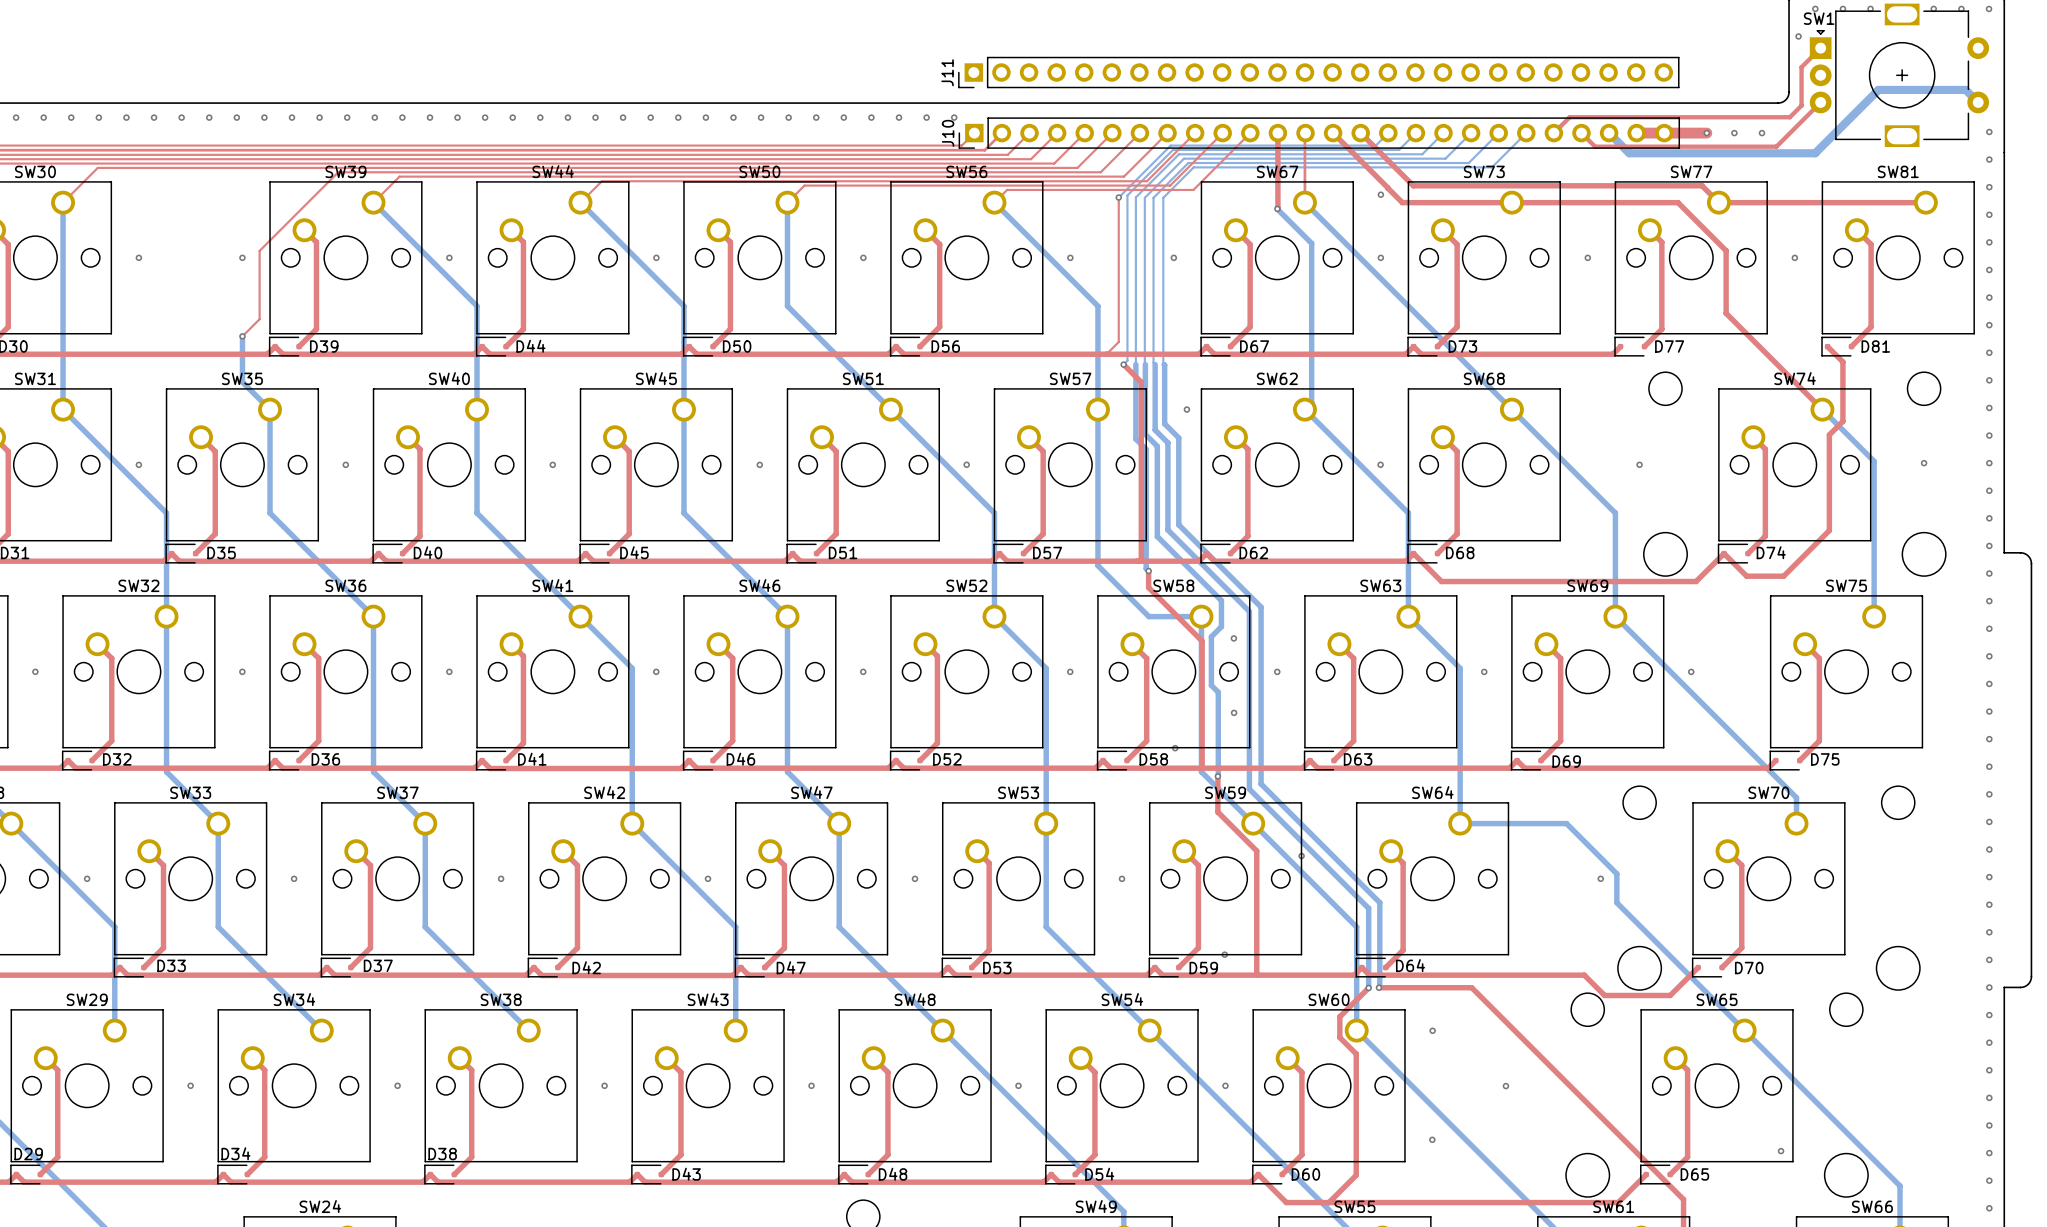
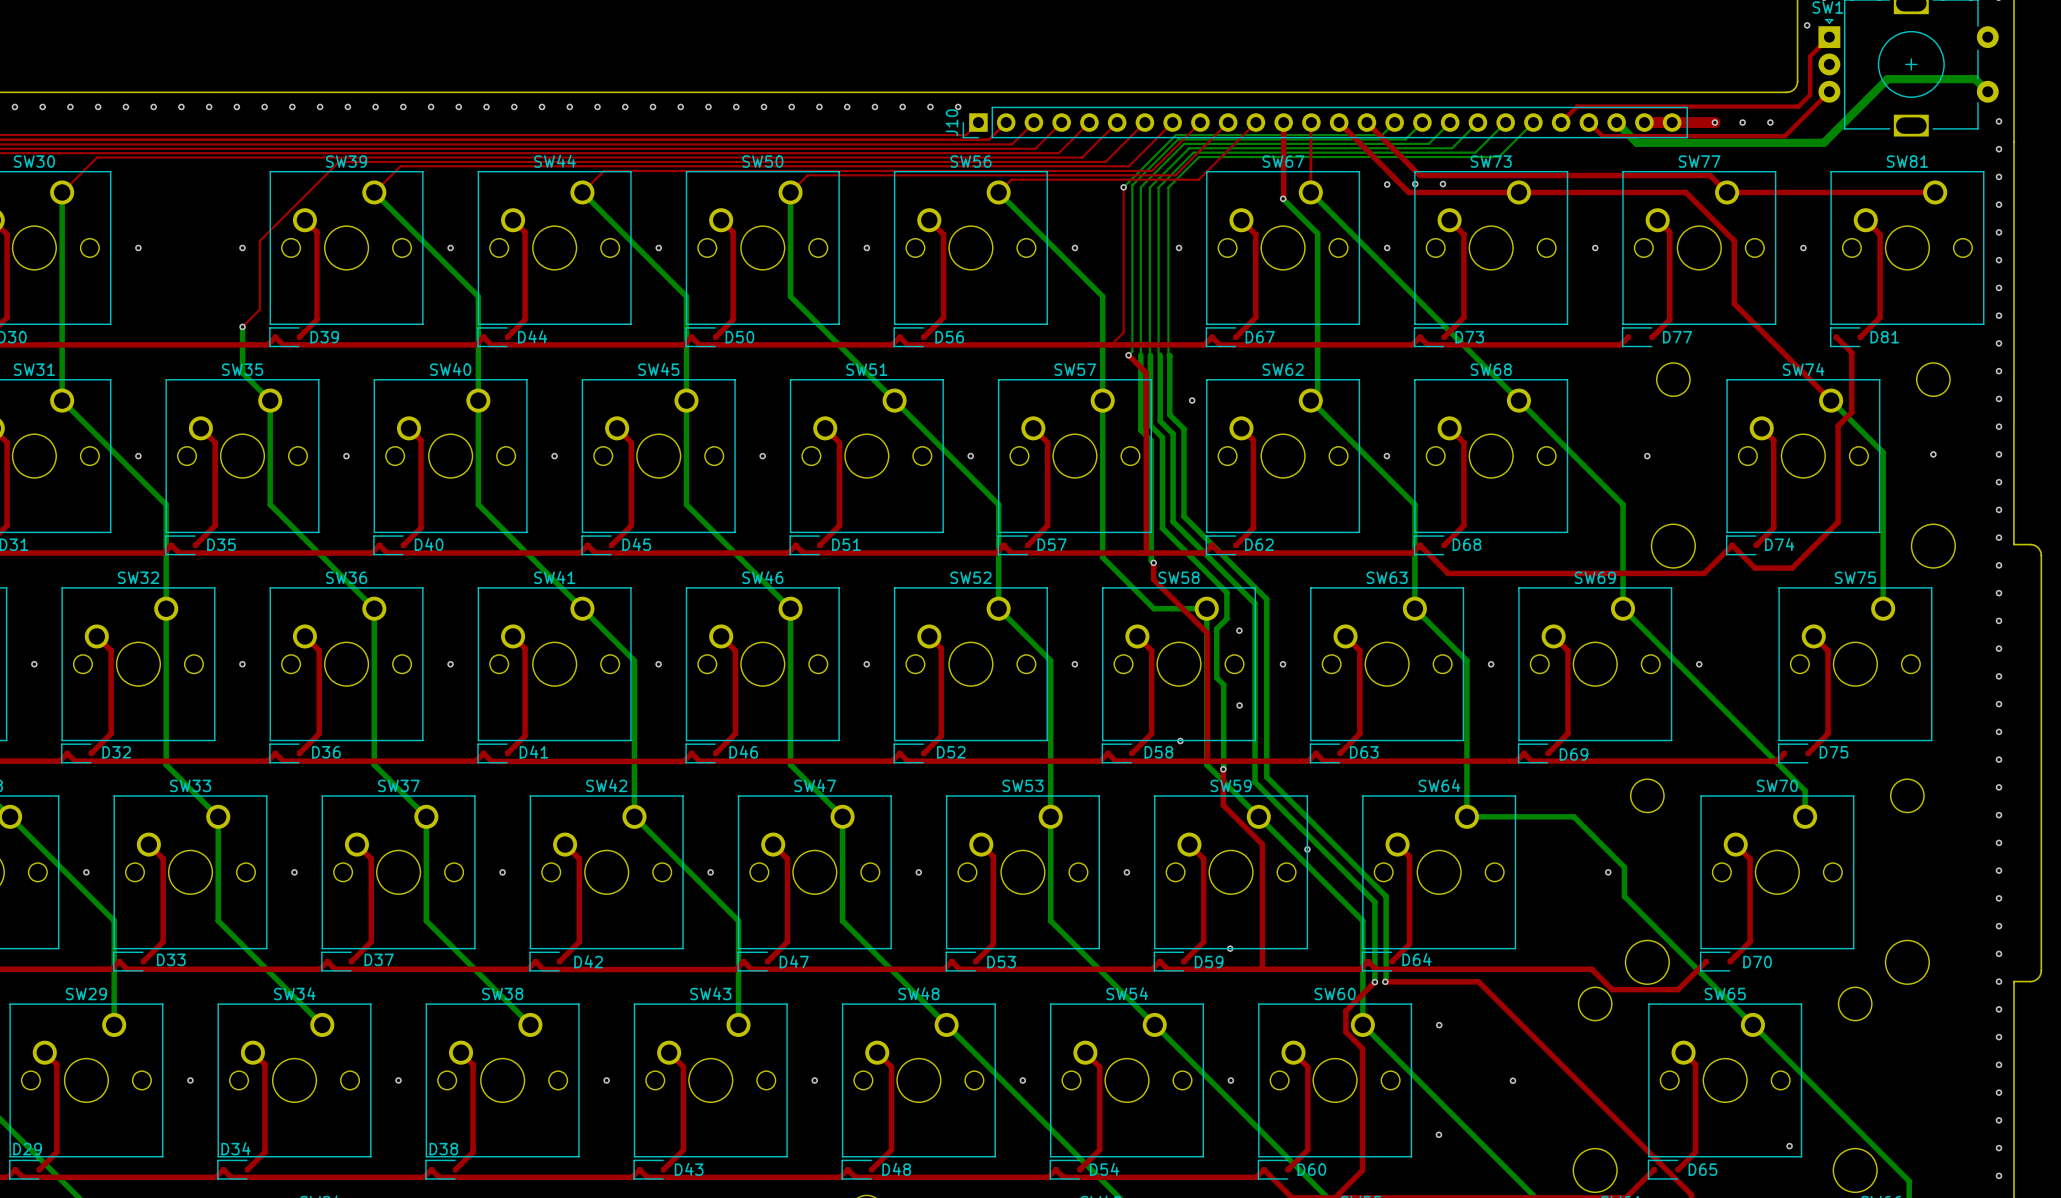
J11: (1318, 72) -> none
via: none -> (1415, 184)
via: none -> (1442, 184)

